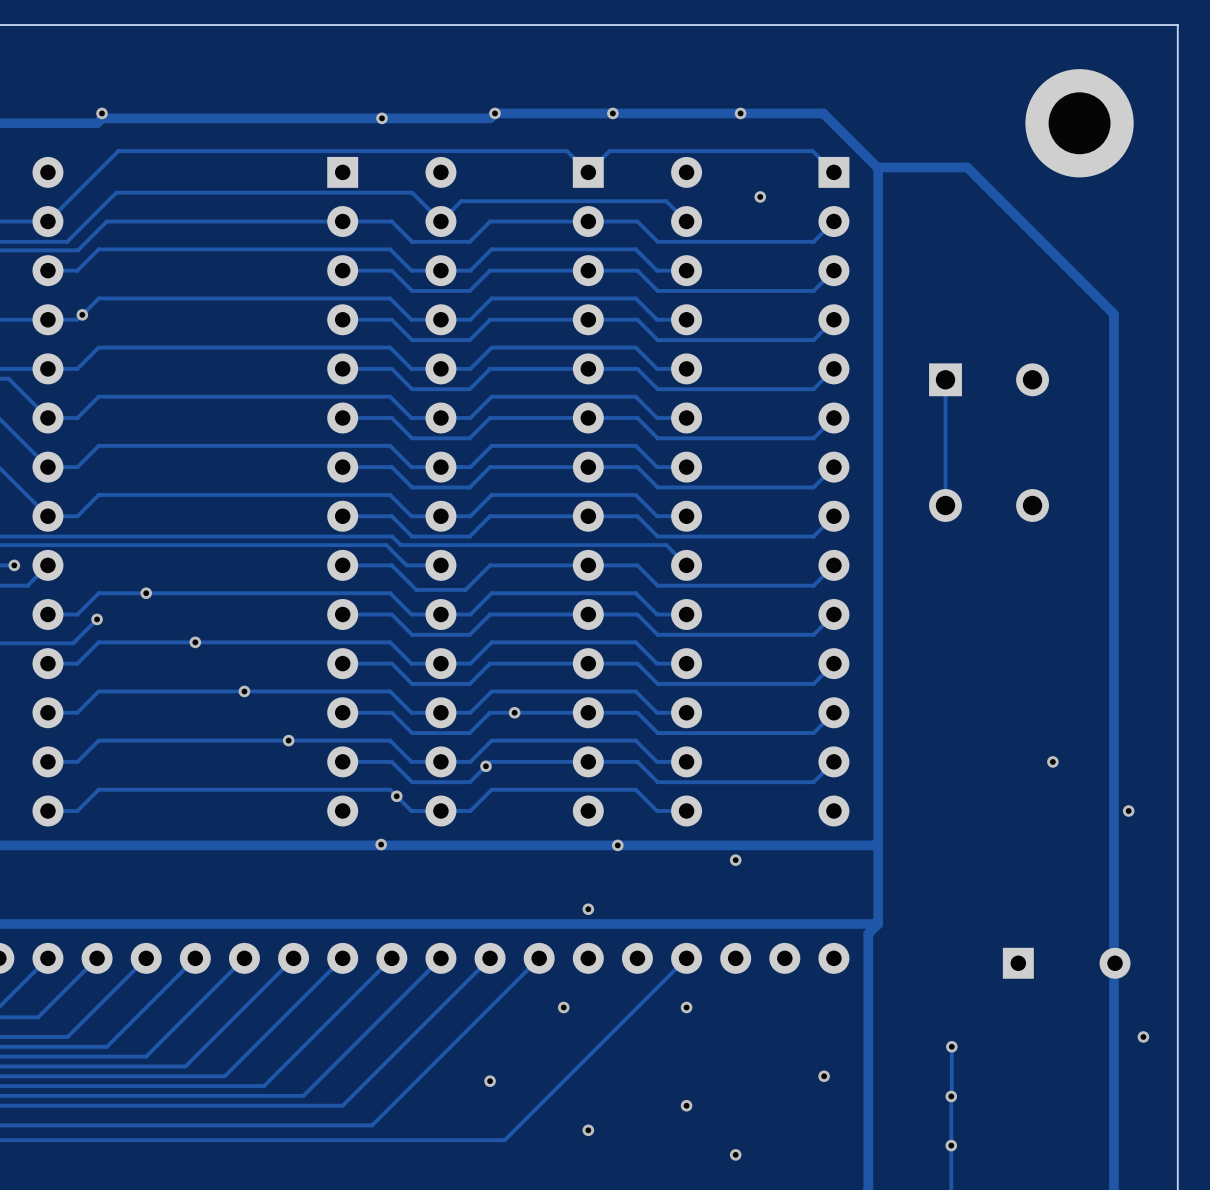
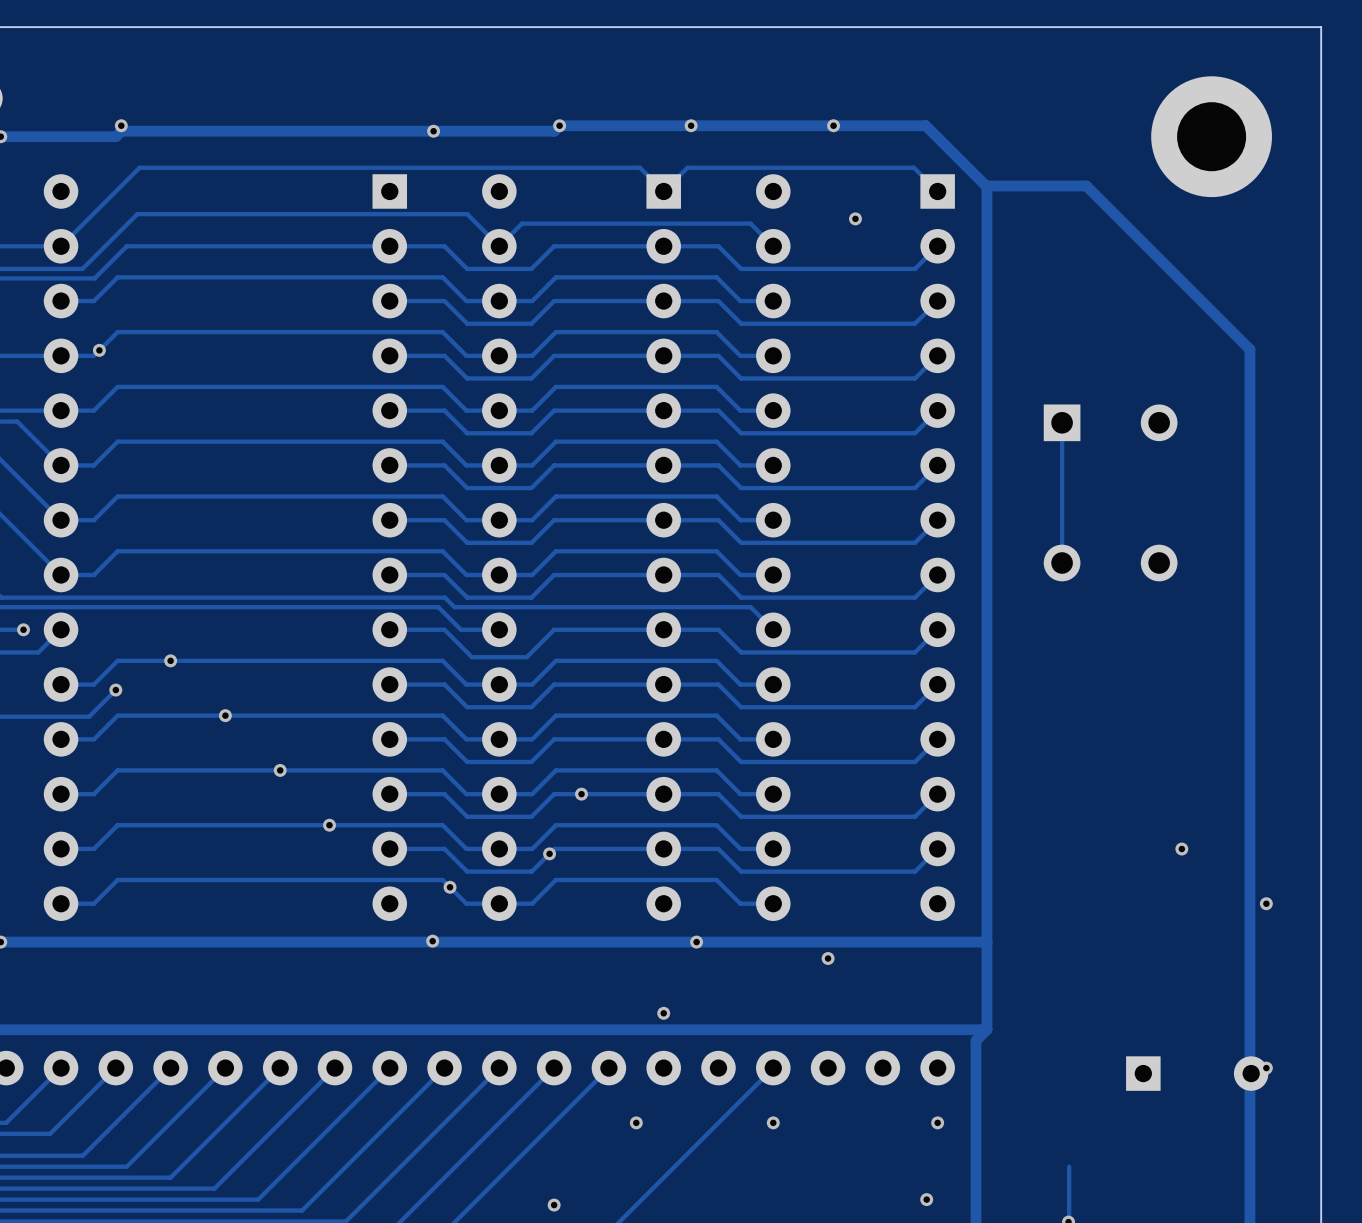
via: none -> (937, 1122)
via position: (1143, 1036) -> (1266, 1068)
via: (951, 1046) -> none

